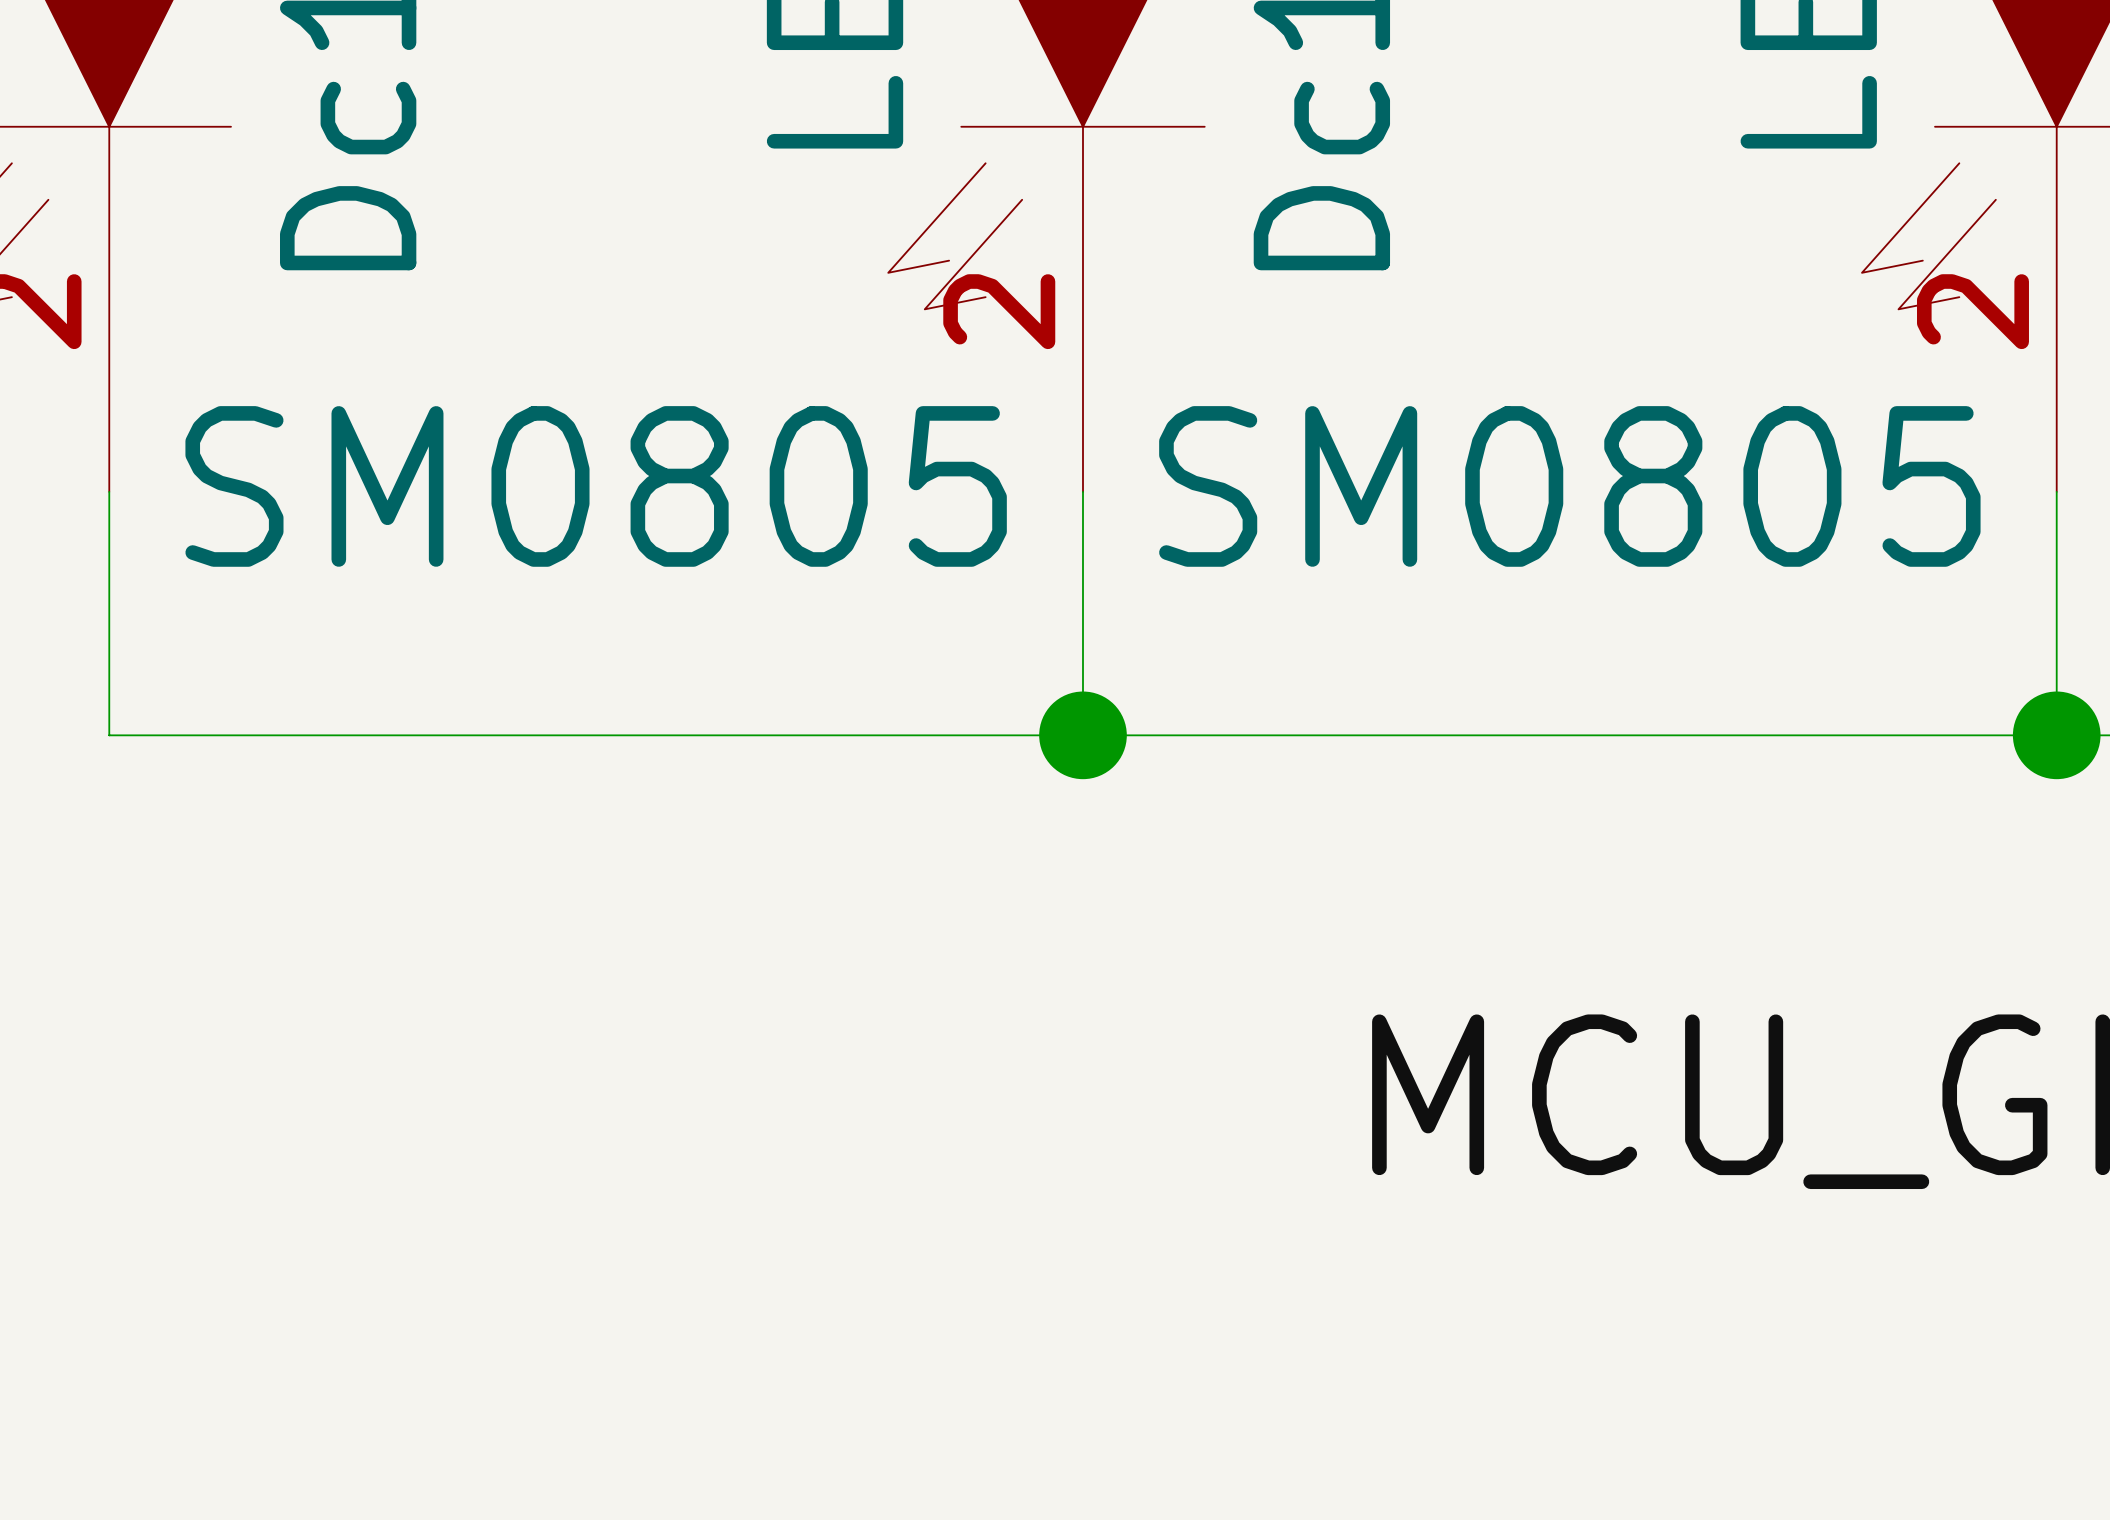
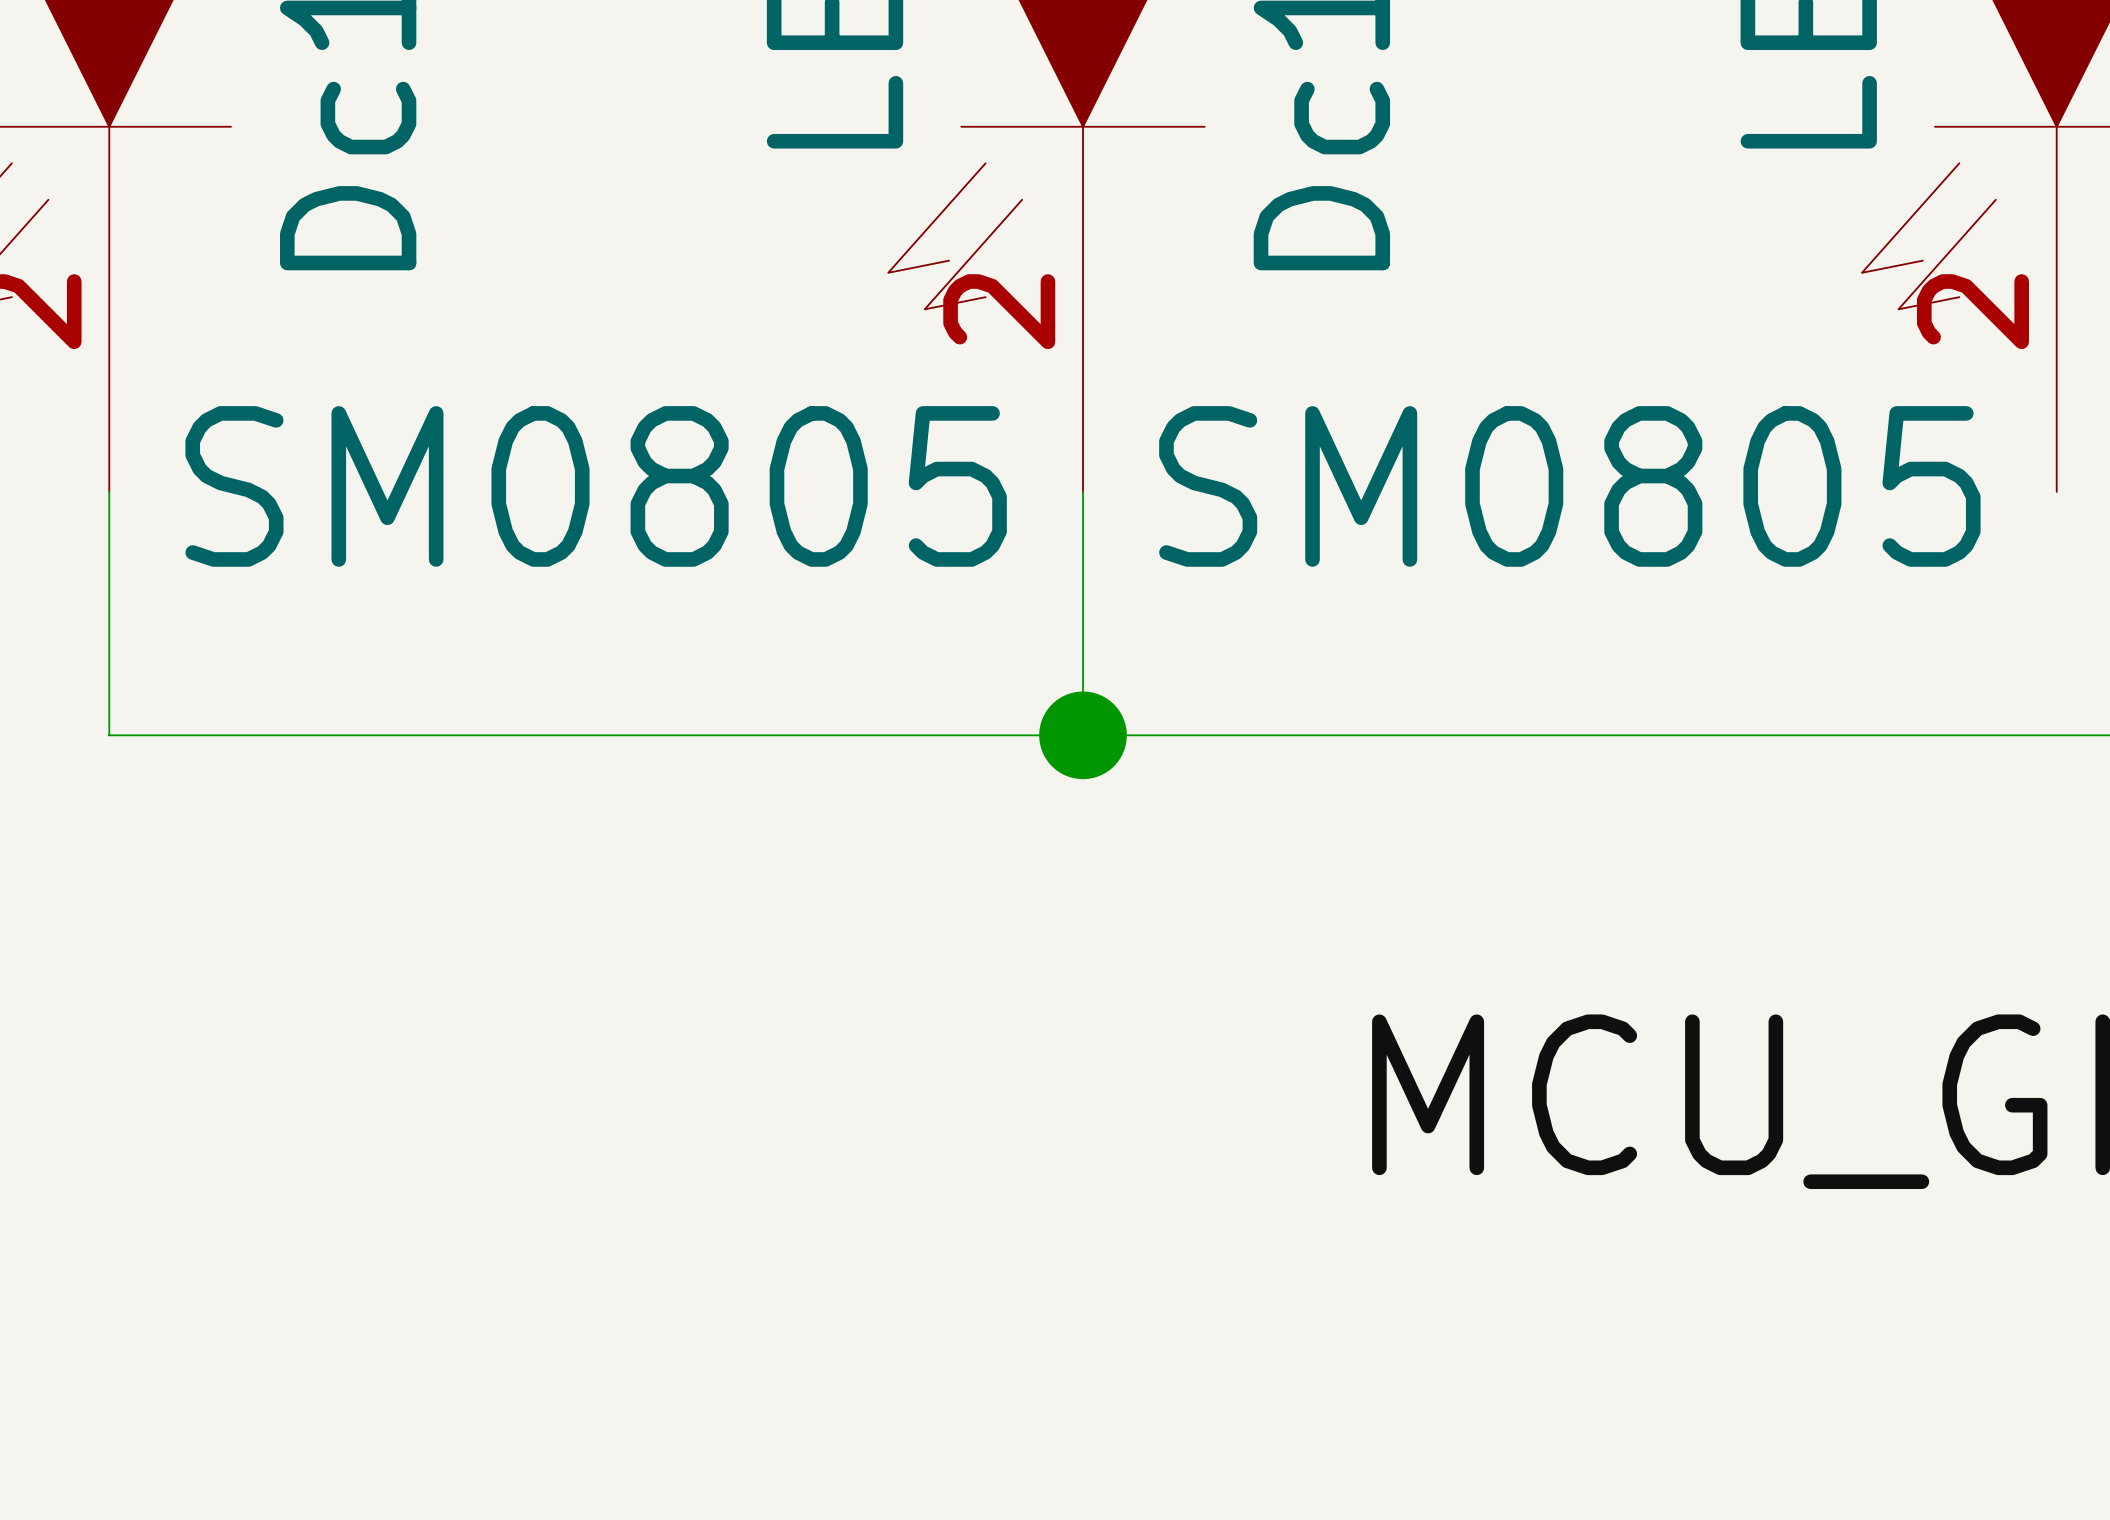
wire: (2056, 491) (2056, 735) -> none
junction: (2056, 735) -> none

